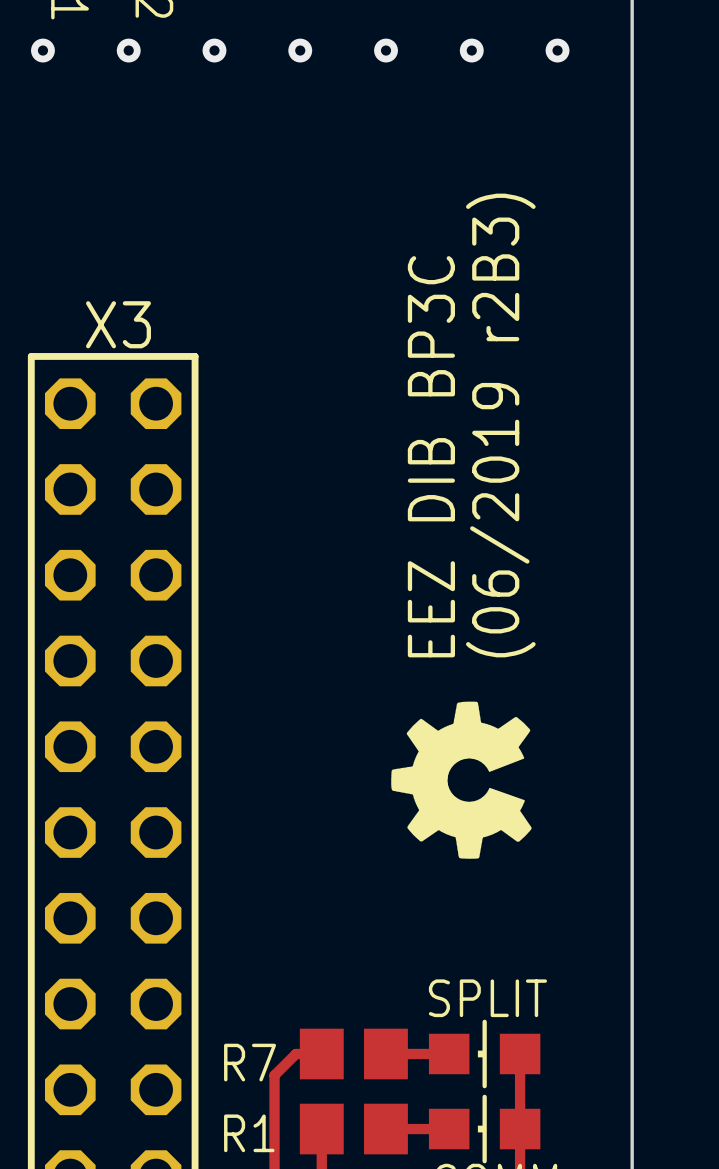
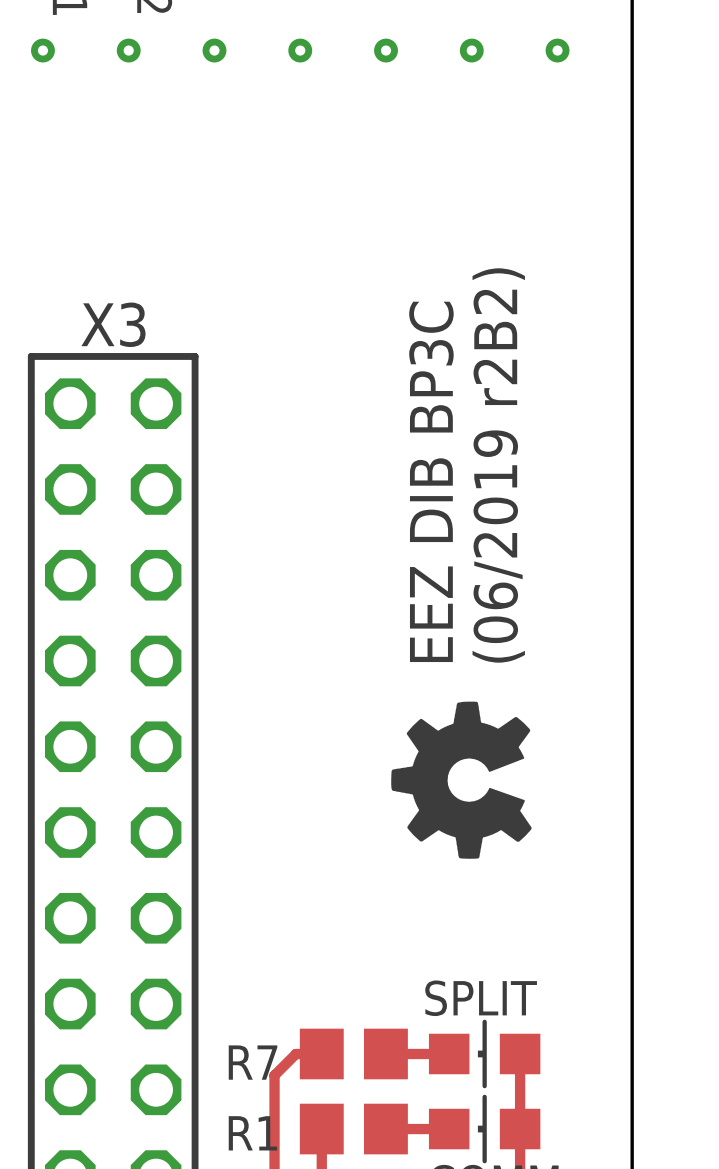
text: (06/2019 r2B3) (500, 425) -> (06/2019 r2B2) (498, 465)

